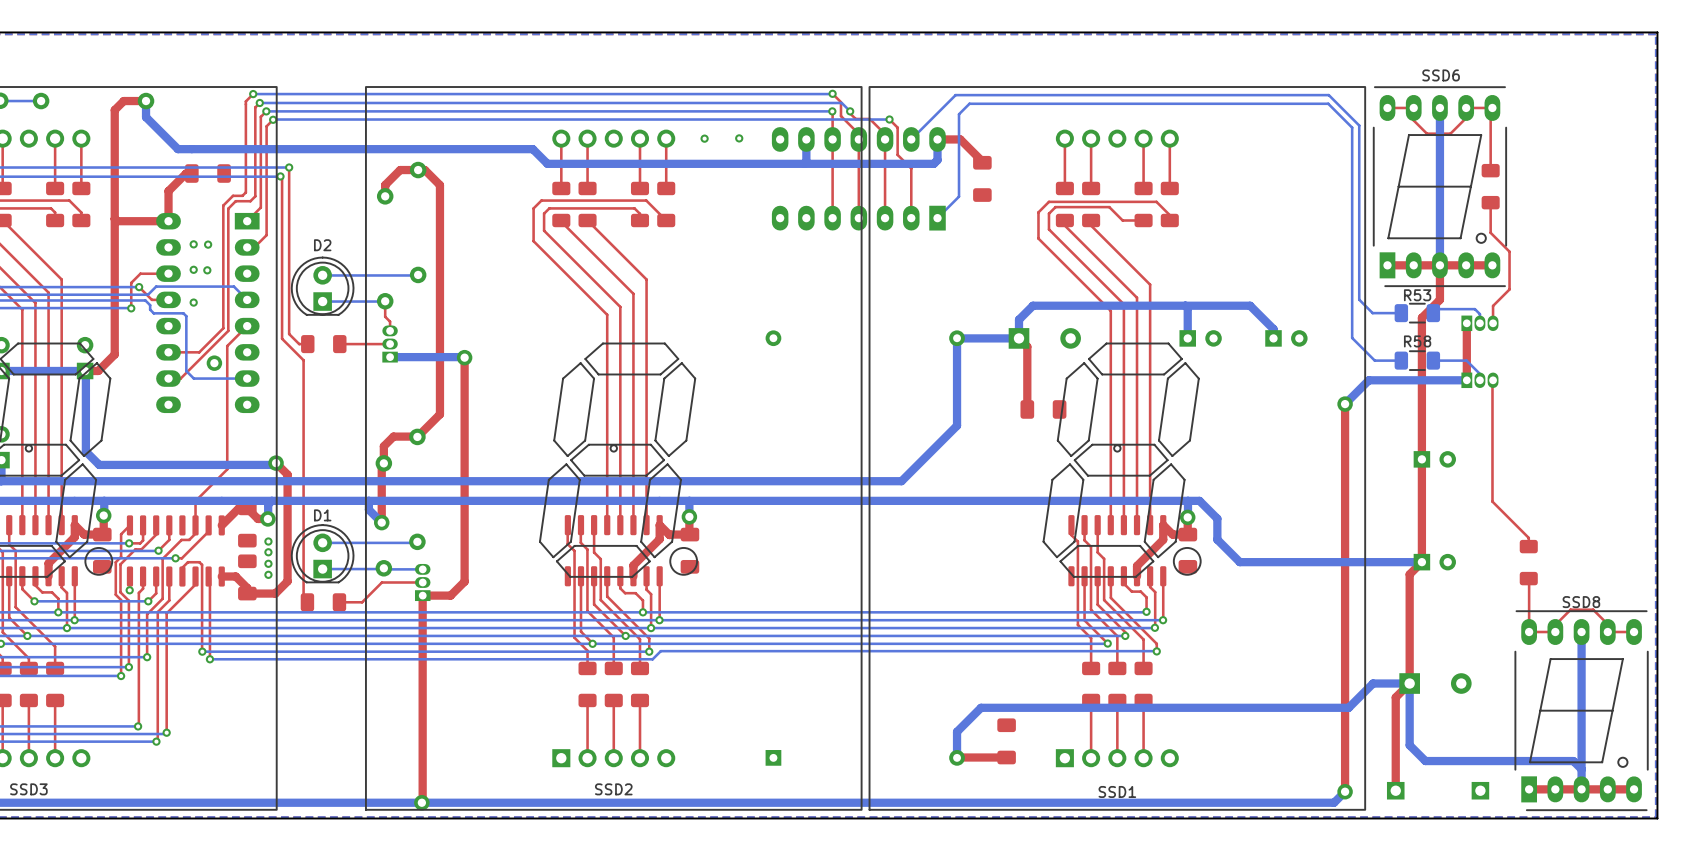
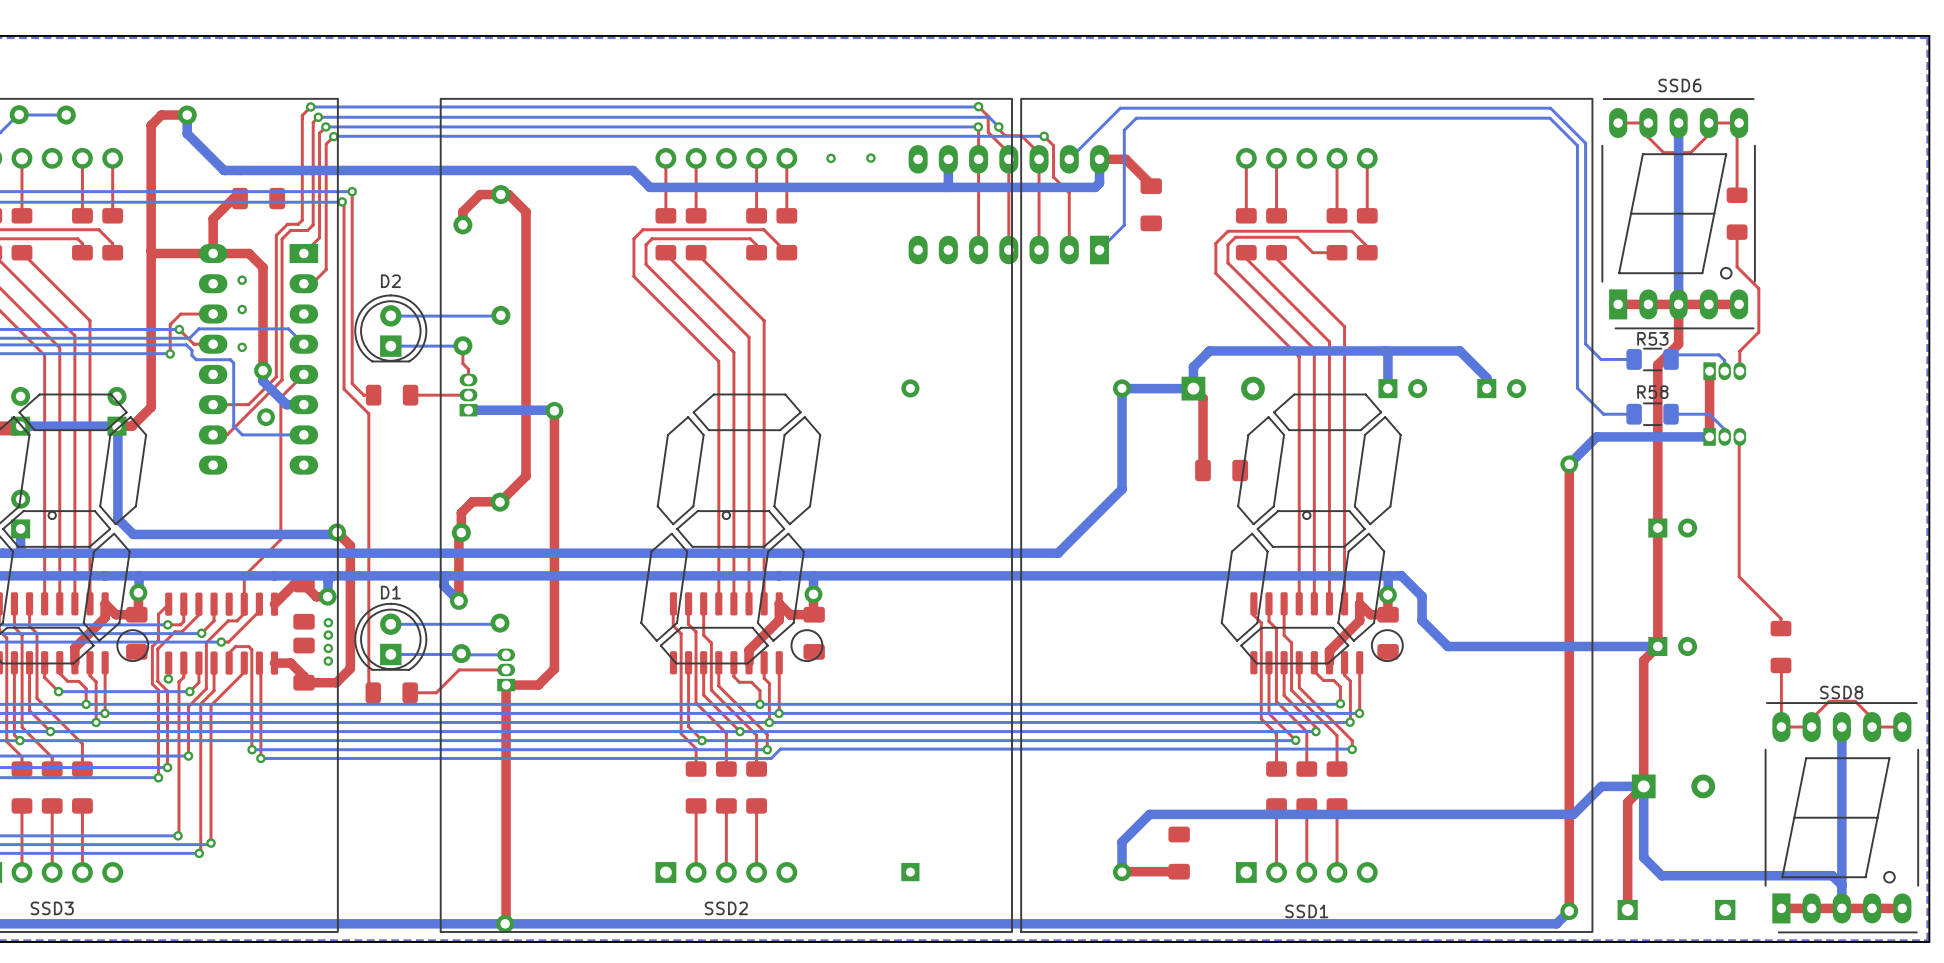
top track: none -> (213, 253) (249, 253) (263, 267) (263, 370)
via: (208, 244) -> none
via: (207, 270) -> none
bottom track: none -> (263, 370) (263, 381) (286, 404) (303, 404)
via: none -> (263, 370)

